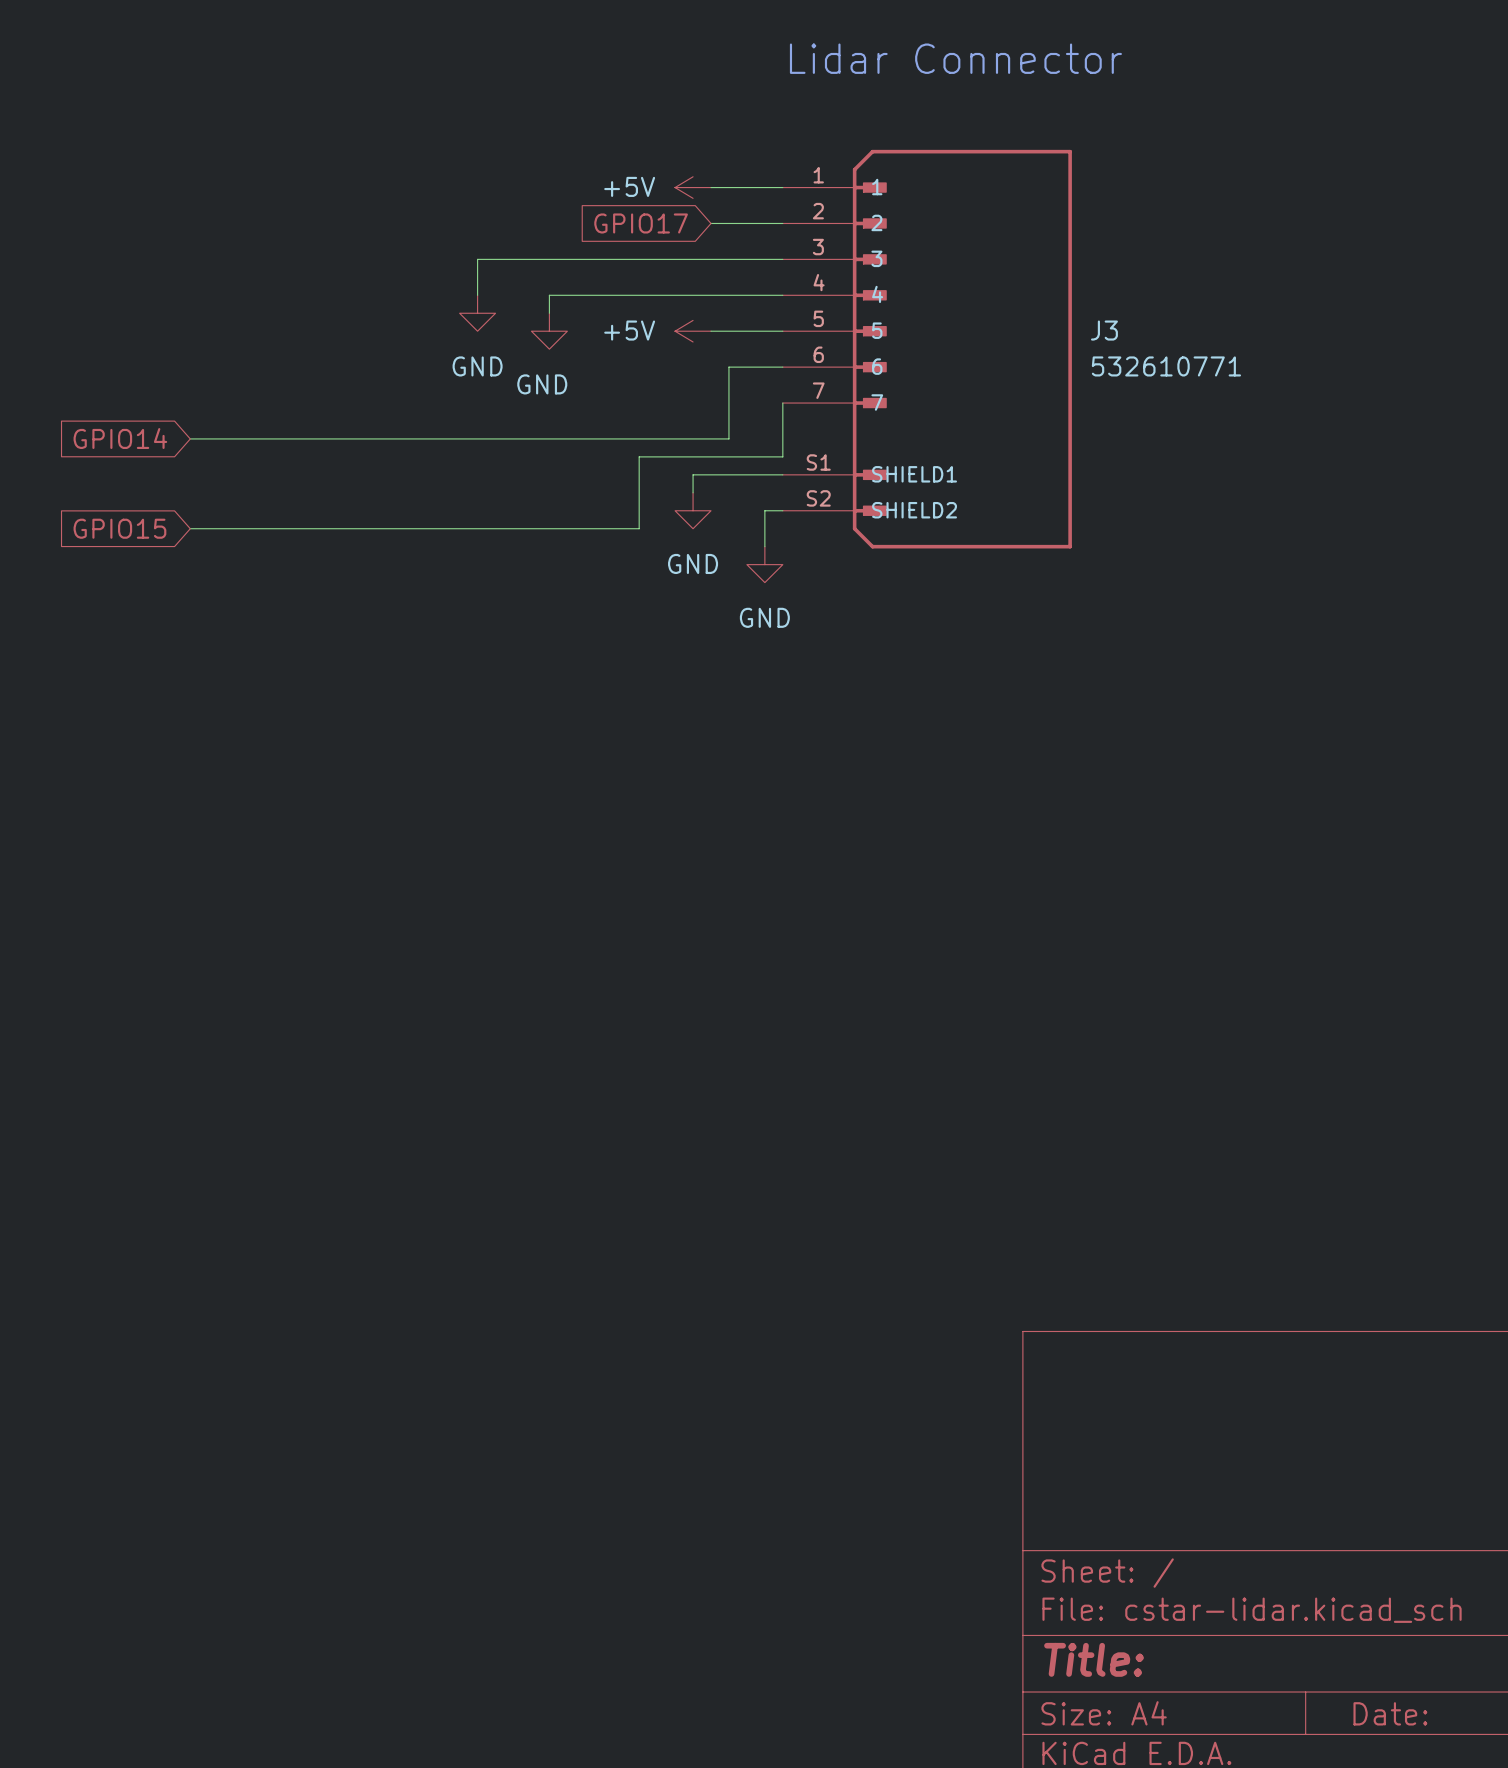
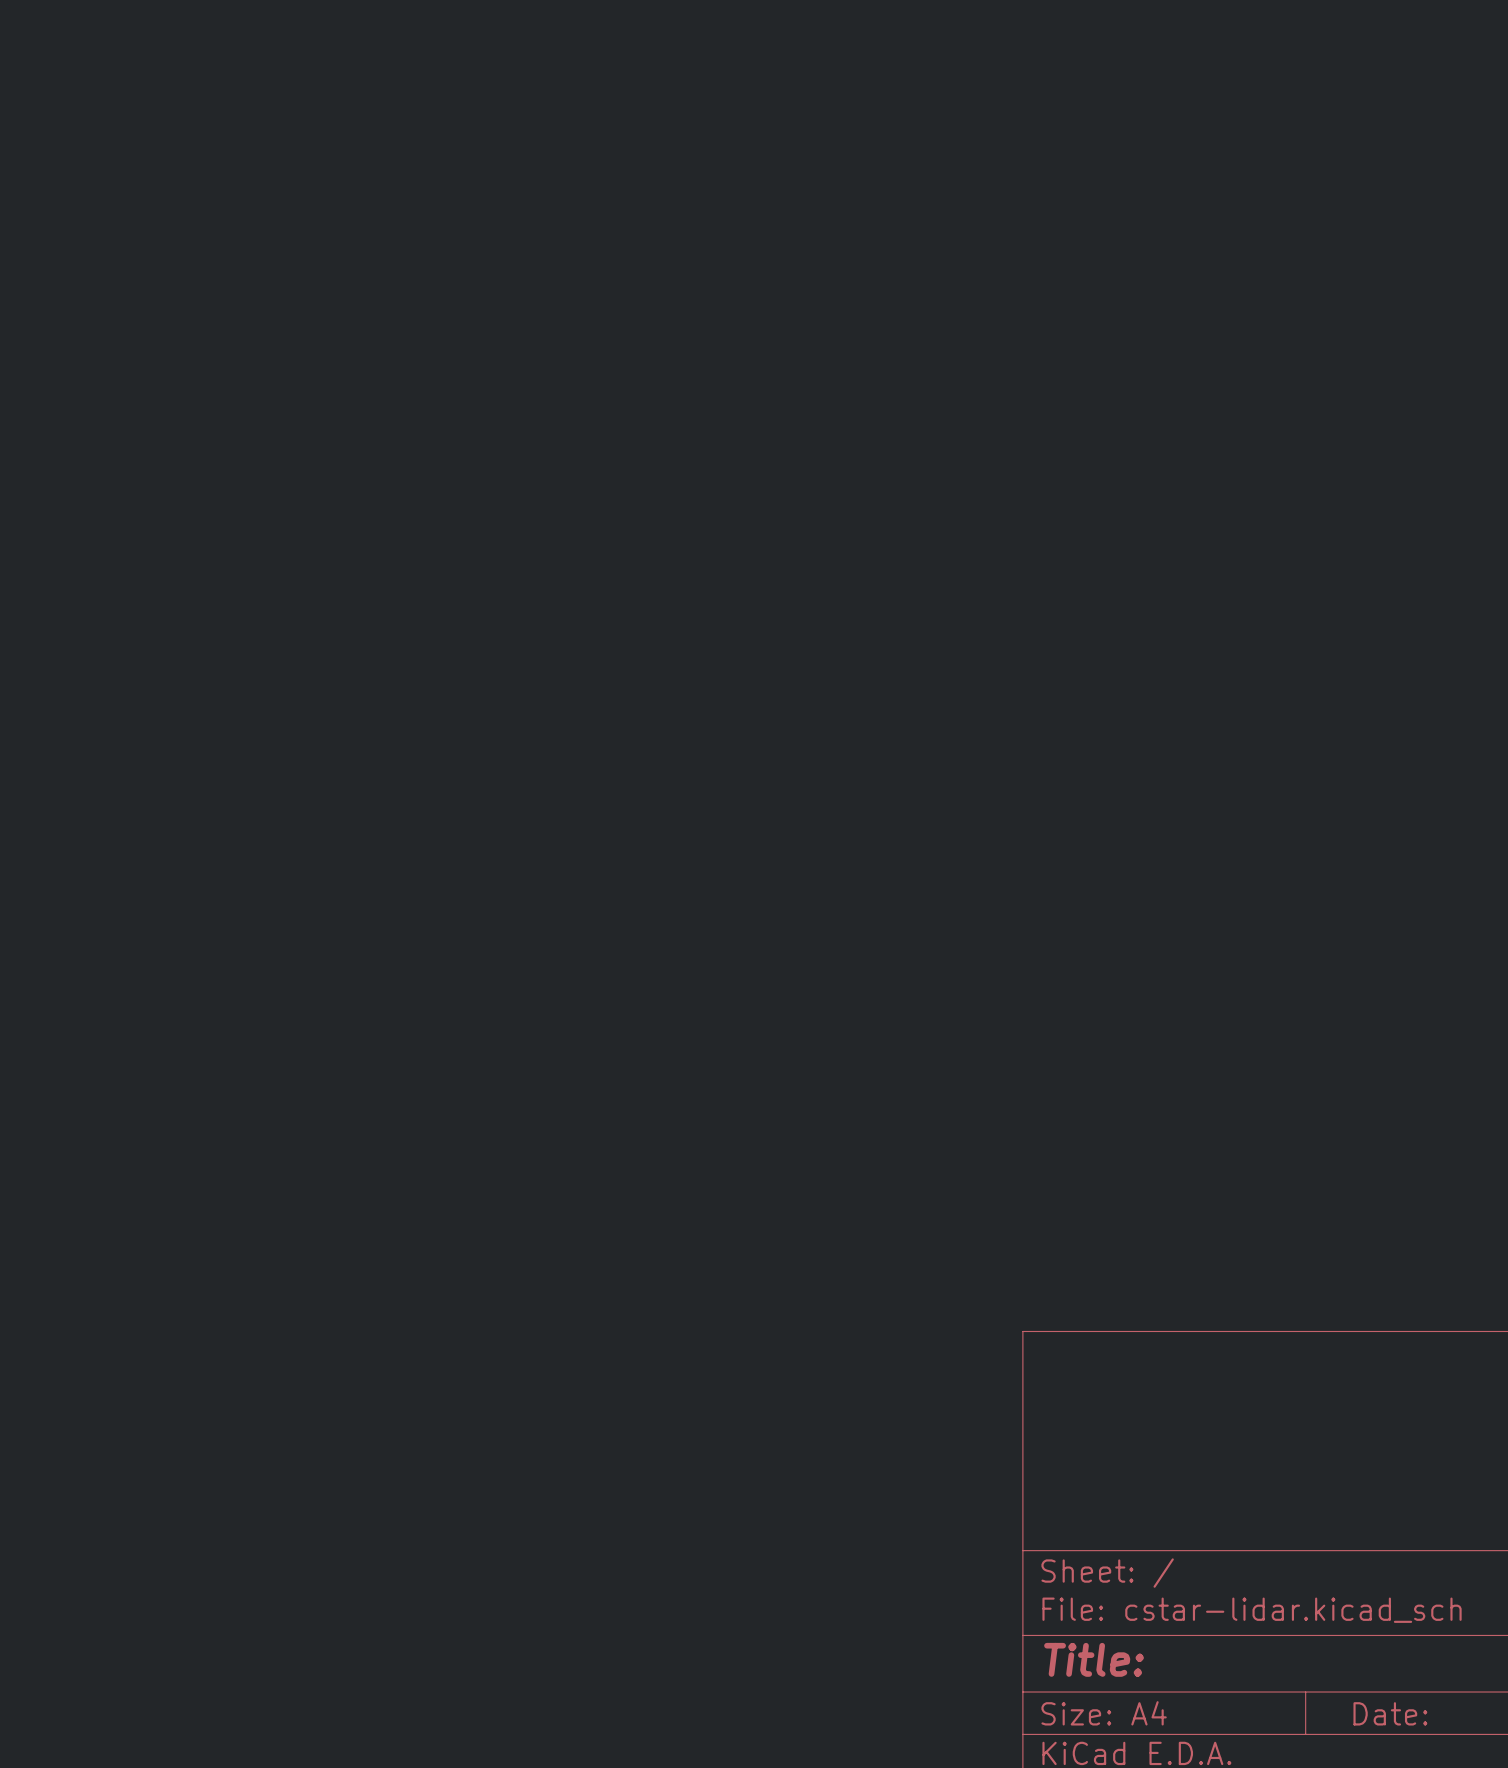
text: Lidar Connector (955, 58) -> none
power symbol: +5V (693, 187) -> none
wire: (711, 187) (782, 187) -> none
global label: GPIO17 (641, 223) -> none
wire: (711, 223) (782, 223) -> none
wire: (782, 259) (477, 259) (477, 295) -> none
wire: (782, 295) (549, 295) (549, 313) -> none
power symbol: GND (477, 313) -> none
power symbol: GND (549, 331) -> none
power symbol: +5V (693, 331) -> none
wire: (711, 331) (782, 331) -> none
J3: 532610771 (927, 349) -> none
wire: (782, 367) (728, 367) (728, 438) (190, 438) -> none
wire: (782, 403) (782, 456) (639, 456) (639, 528) (190, 528) -> none
global label: GPIO14 (120, 438) -> none
wire: (782, 474) (693, 474) (693, 492) -> none
power symbol: GND (693, 510) -> none
wire: (782, 510) (764, 510) (764, 546) -> none
global label: GPIO15 (119, 528) -> none
power symbol: GND (764, 564) -> none

